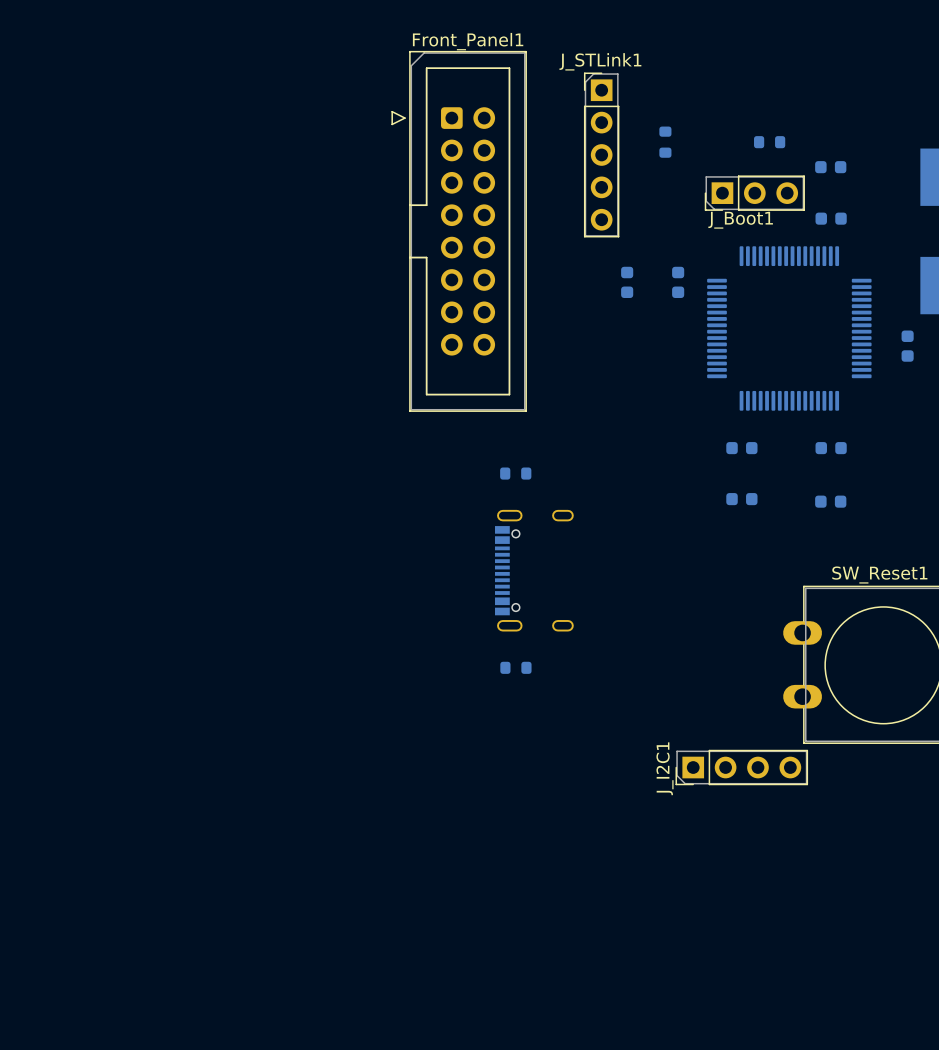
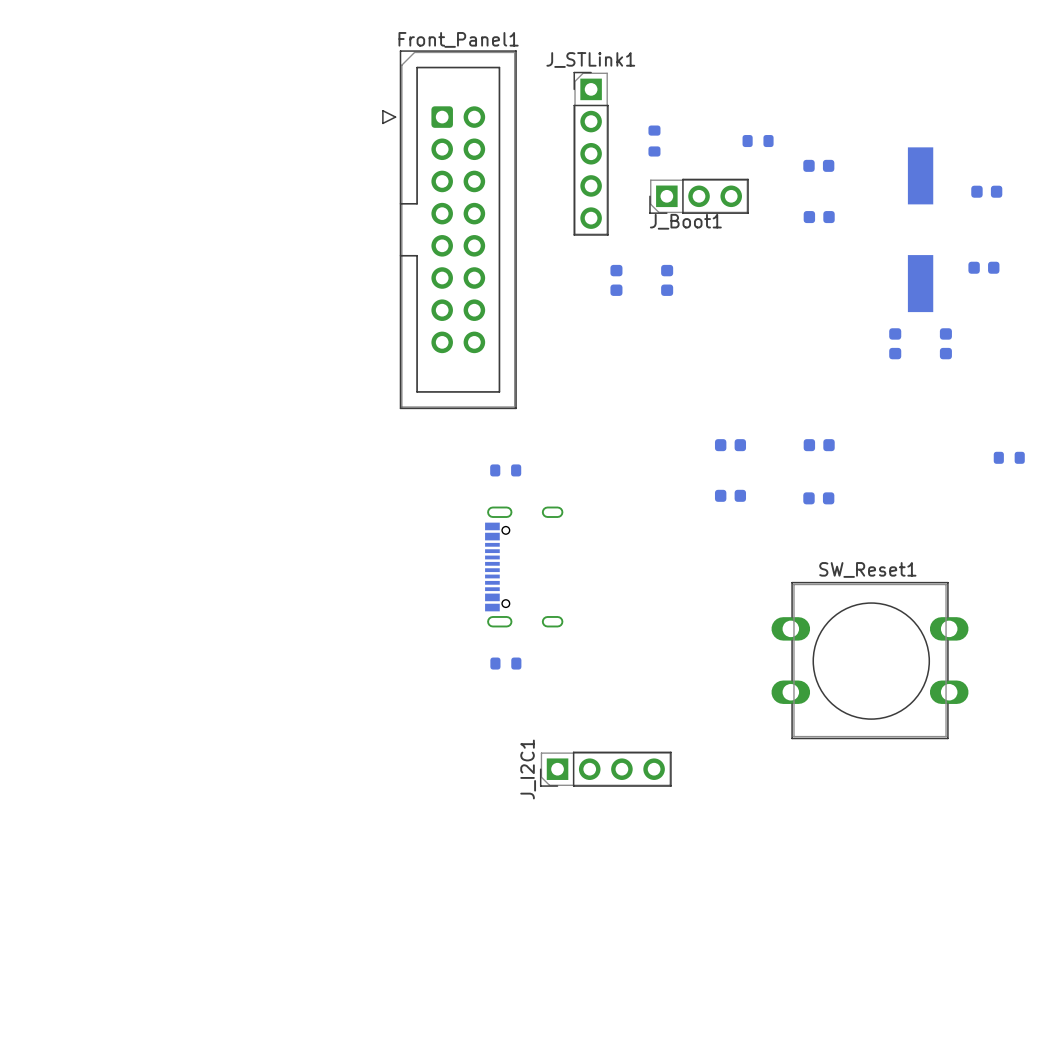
J_Boot1 position: (754, 193) -> (699, 196)
part: (789, 328) -> none
J_I2C1 position: (741, 767) -> (605, 769)

